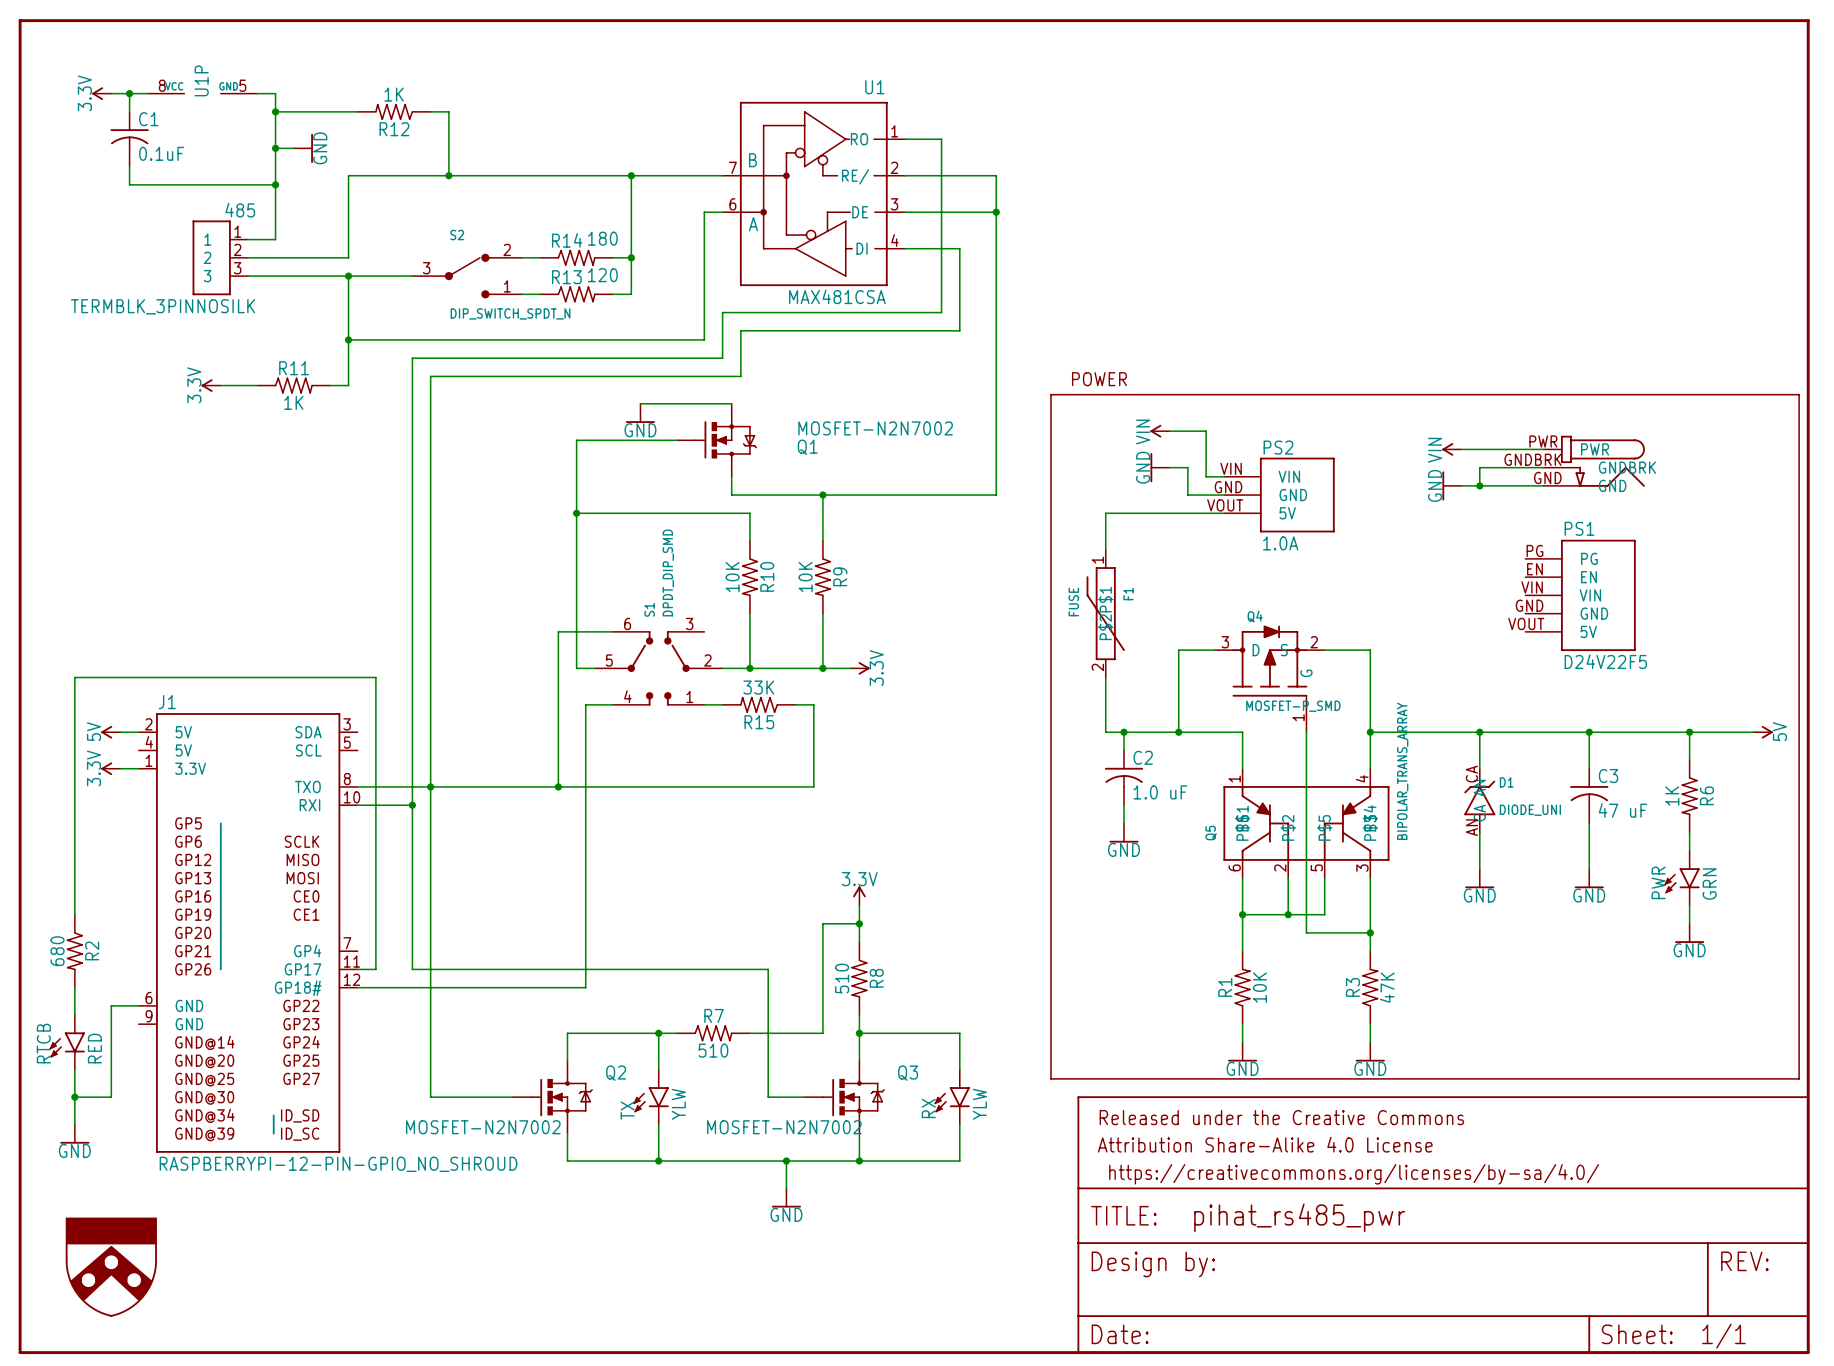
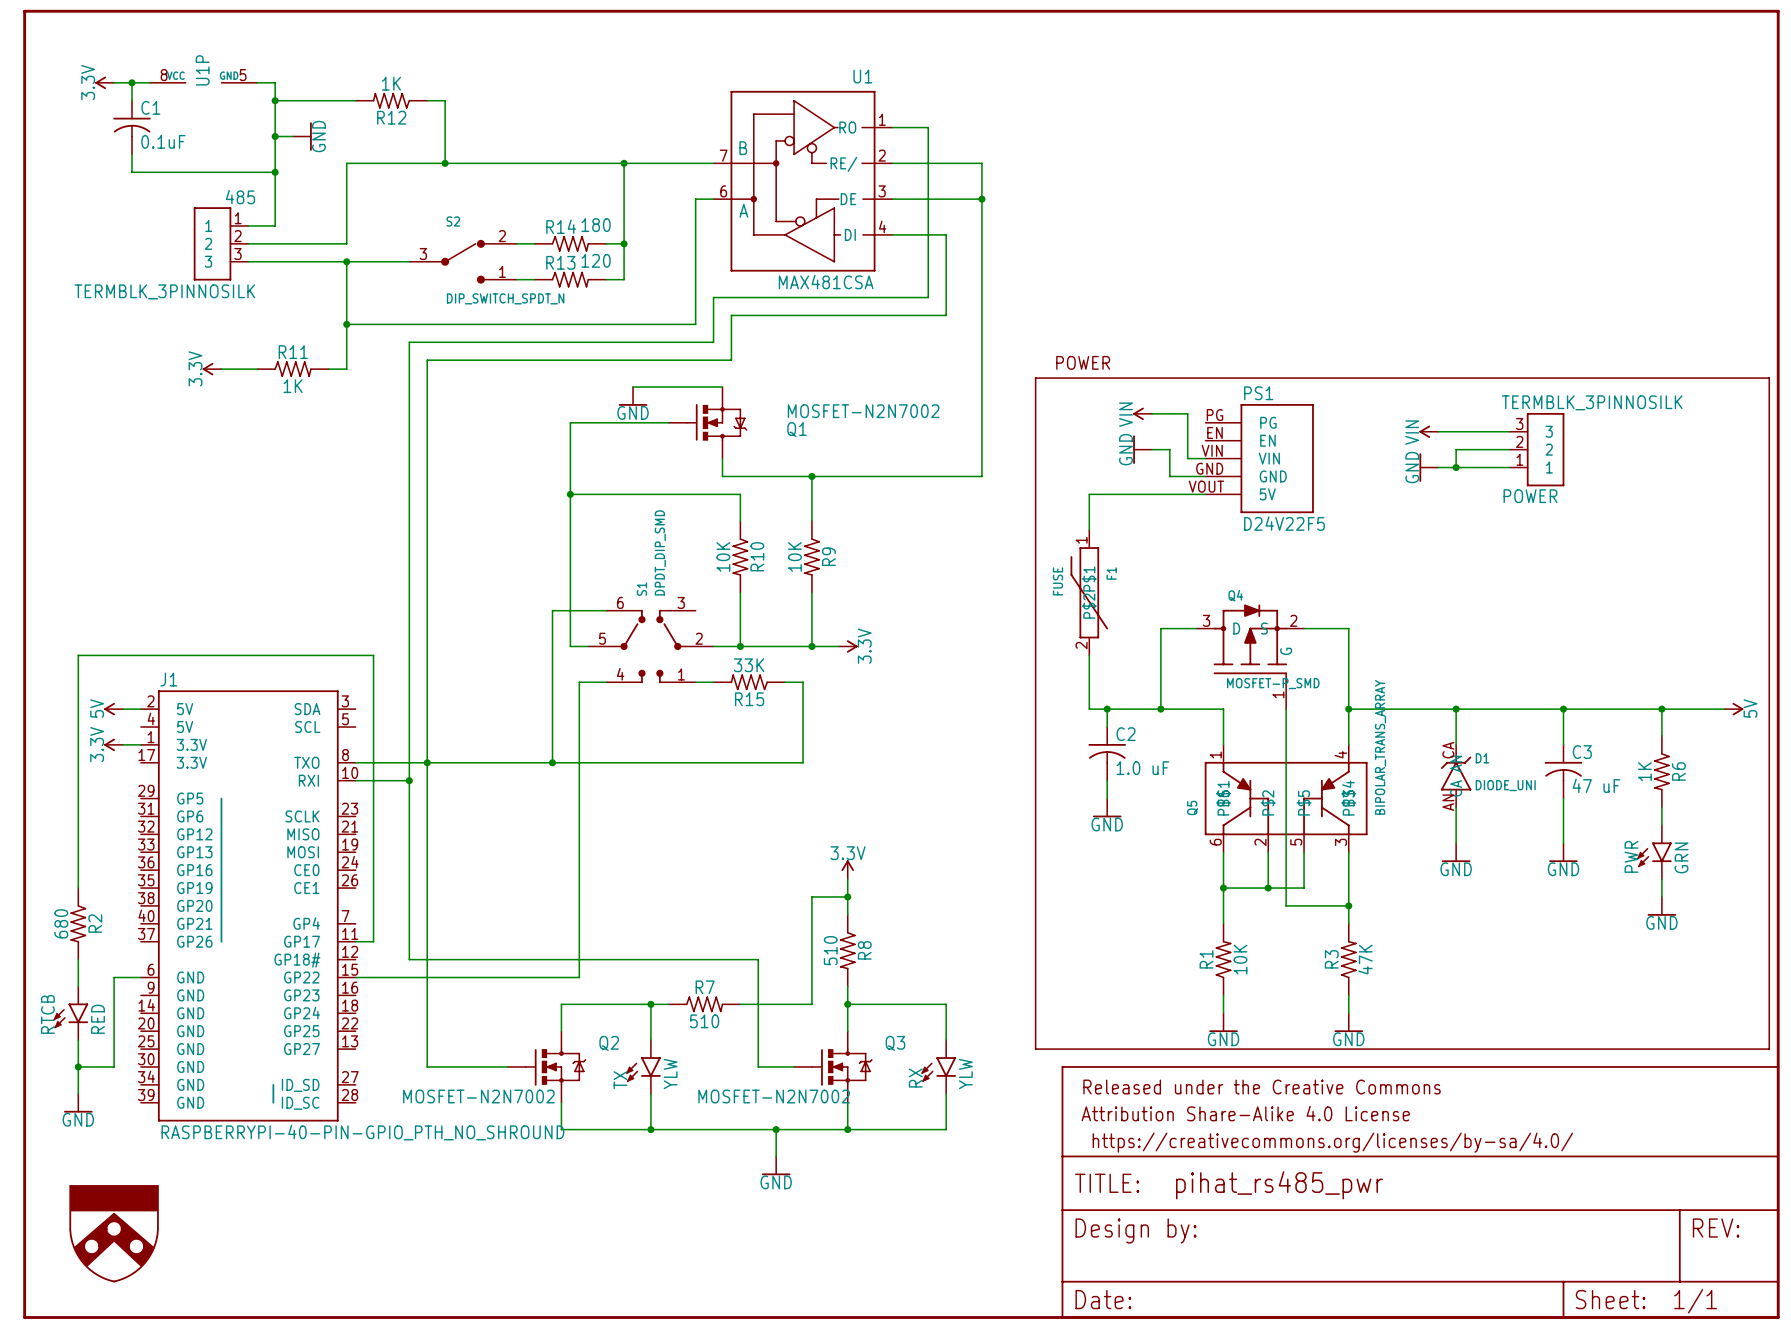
part: (1594, 461) -> none
POWER: none -> TERMBLK_3PINNOSILK (1537, 449)
PS2: 1.0A (1279, 495) -> none
PS1 position: (1580, 595) -> (1259, 458)
J1 symbol: [138, 713, 358, 1153] -> [140, 690, 356, 1122]
wire: (412, 969) (768, 969) (768, 987) -> (355, 977) (579, 977) (579, 959) (758, 959)
wire: (357, 987) (412, 987) -> (409, 941) (409, 959)
J1 value: RASPBERRYPI-12-PIN-GPIO_NO_SHROUD (338, 1164) -> RASPBERRYPI-40-PIN-GPIO_PTH_NO_SHROUND (362, 1132)

